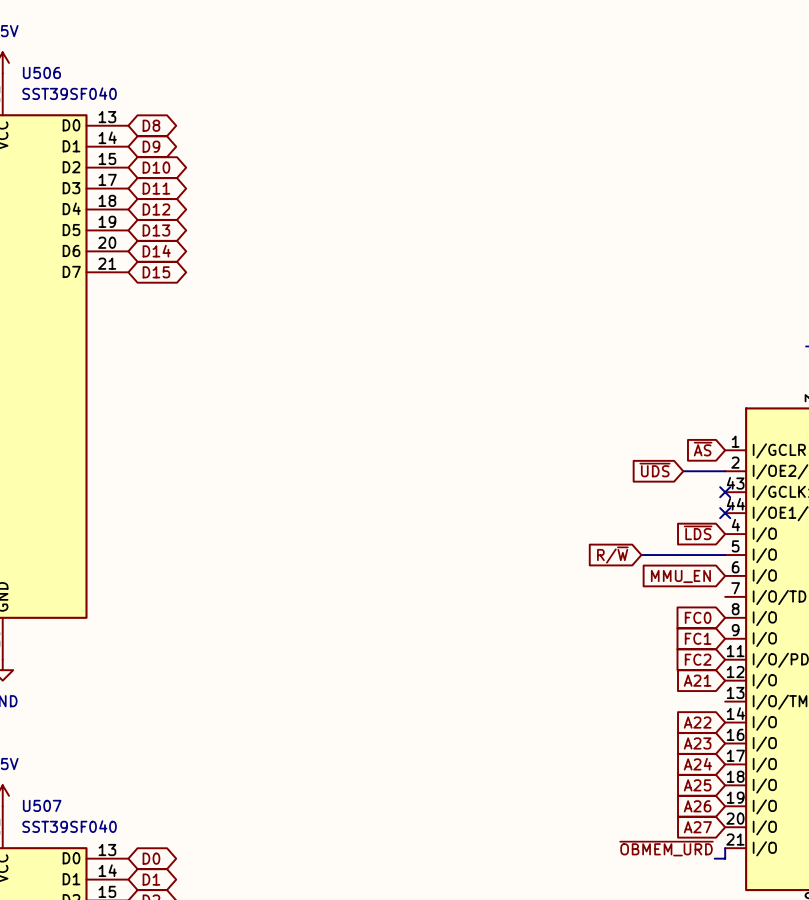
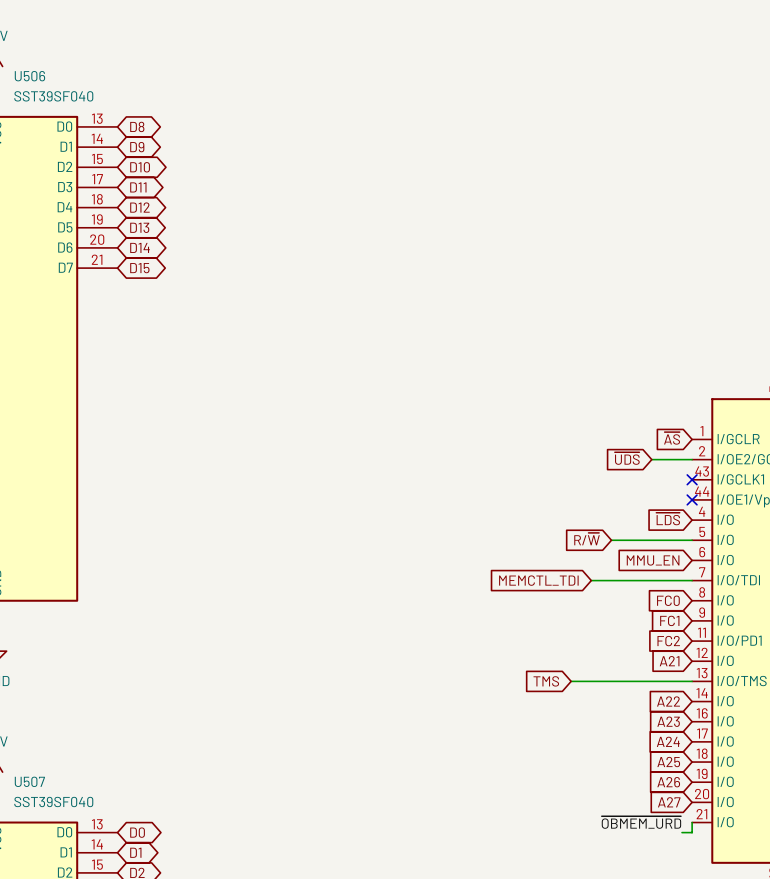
wire: none -> (591, 580) (692, 580)
global label: none -> MEMCTL_TDI (538, 580)
global label: none -> TMS (546, 681)
wire: none -> (571, 681) (692, 681)

